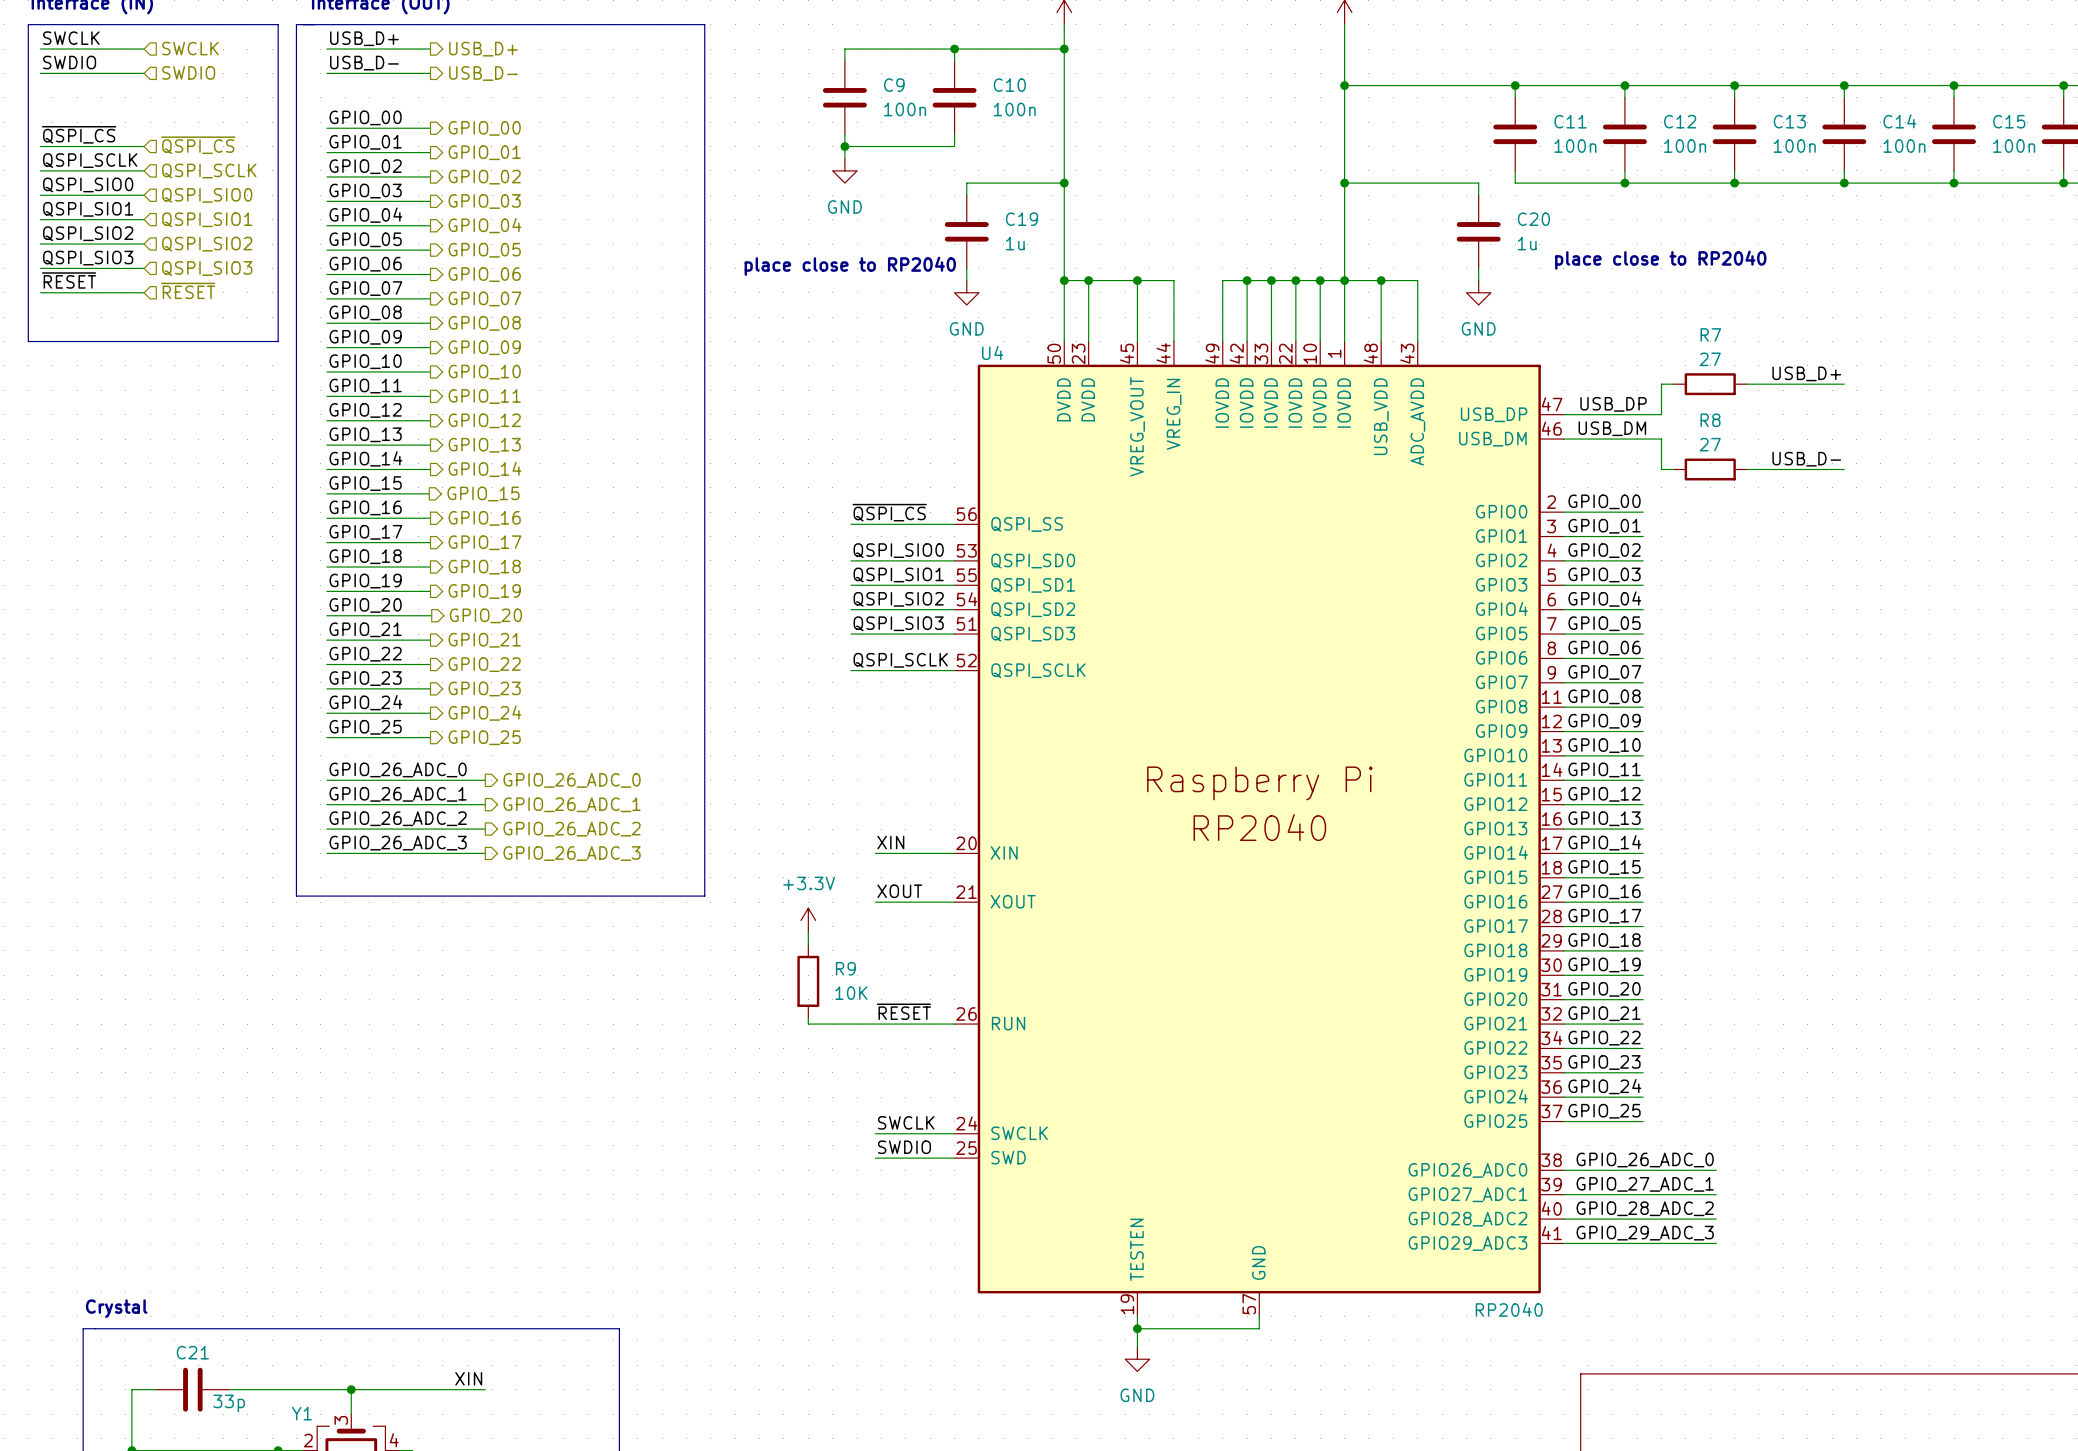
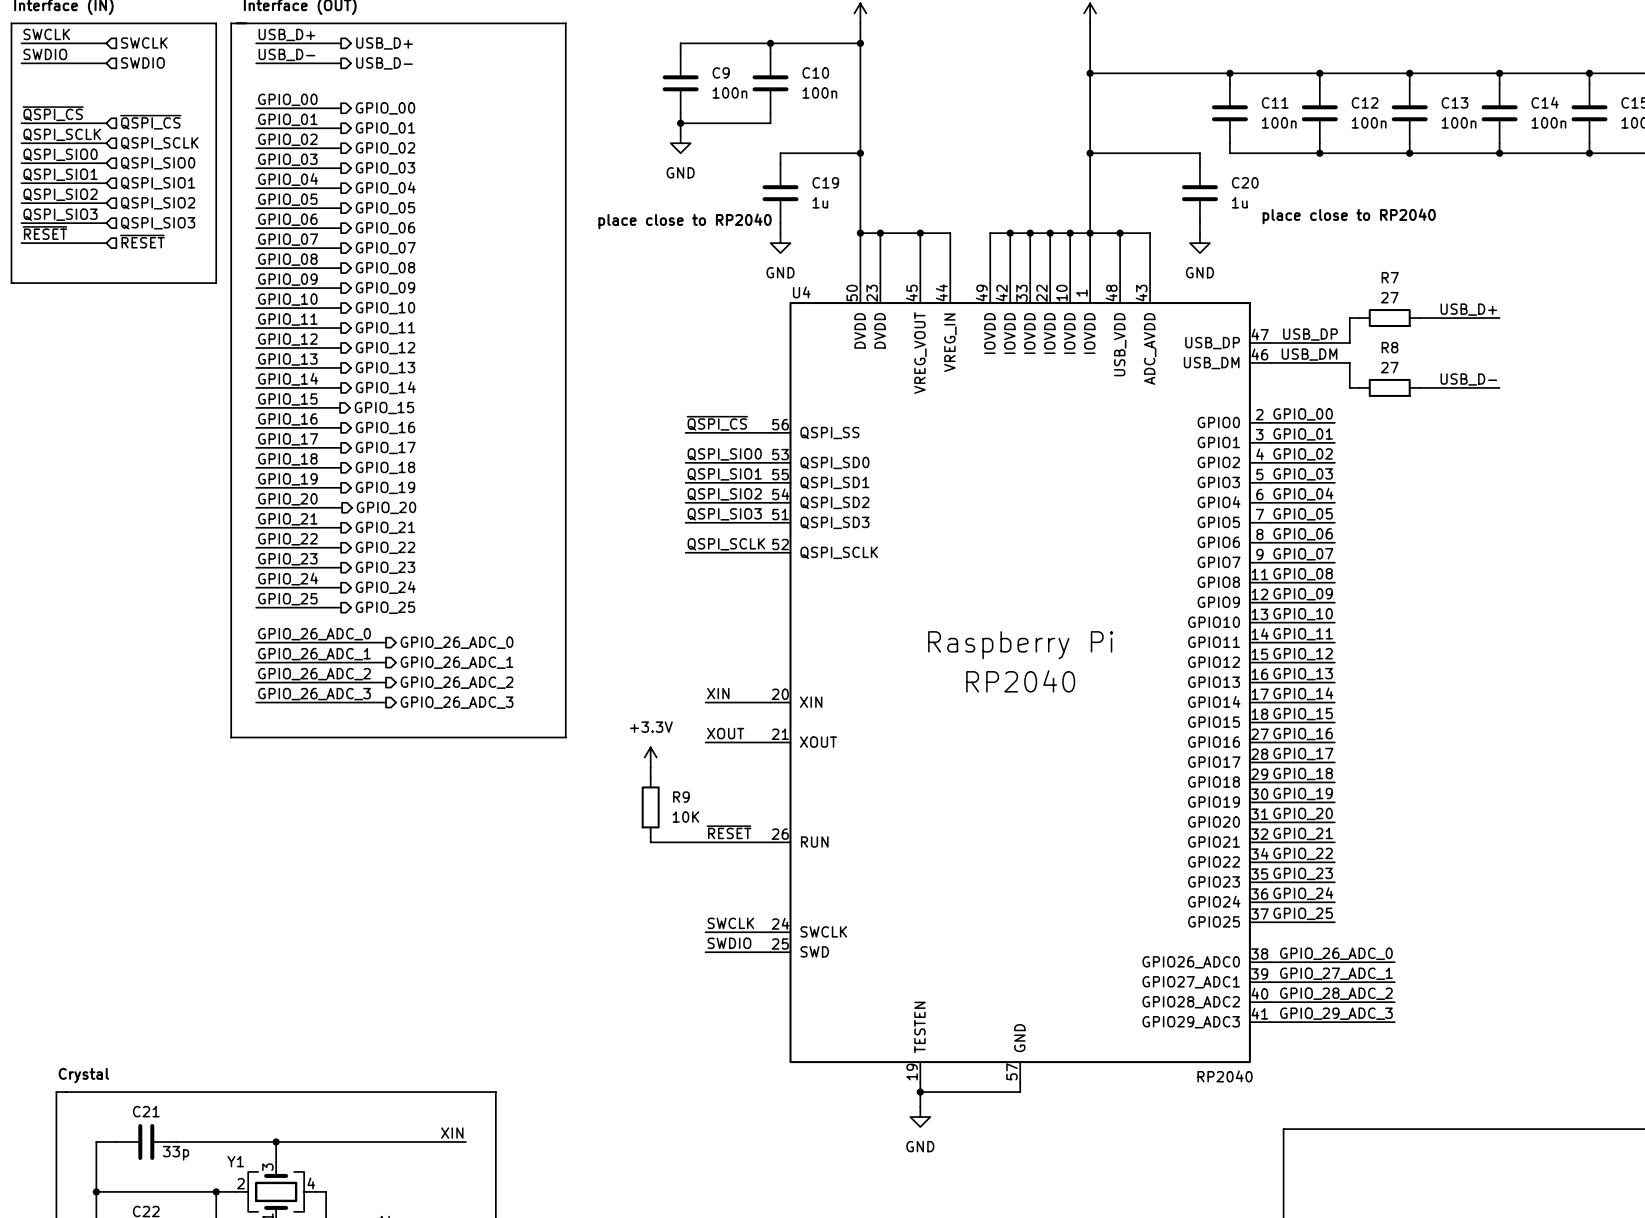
label position: XIN (468, 1378) -> XIN (452, 1133)
wire: none -> (386, 1141) (465, 1141)

